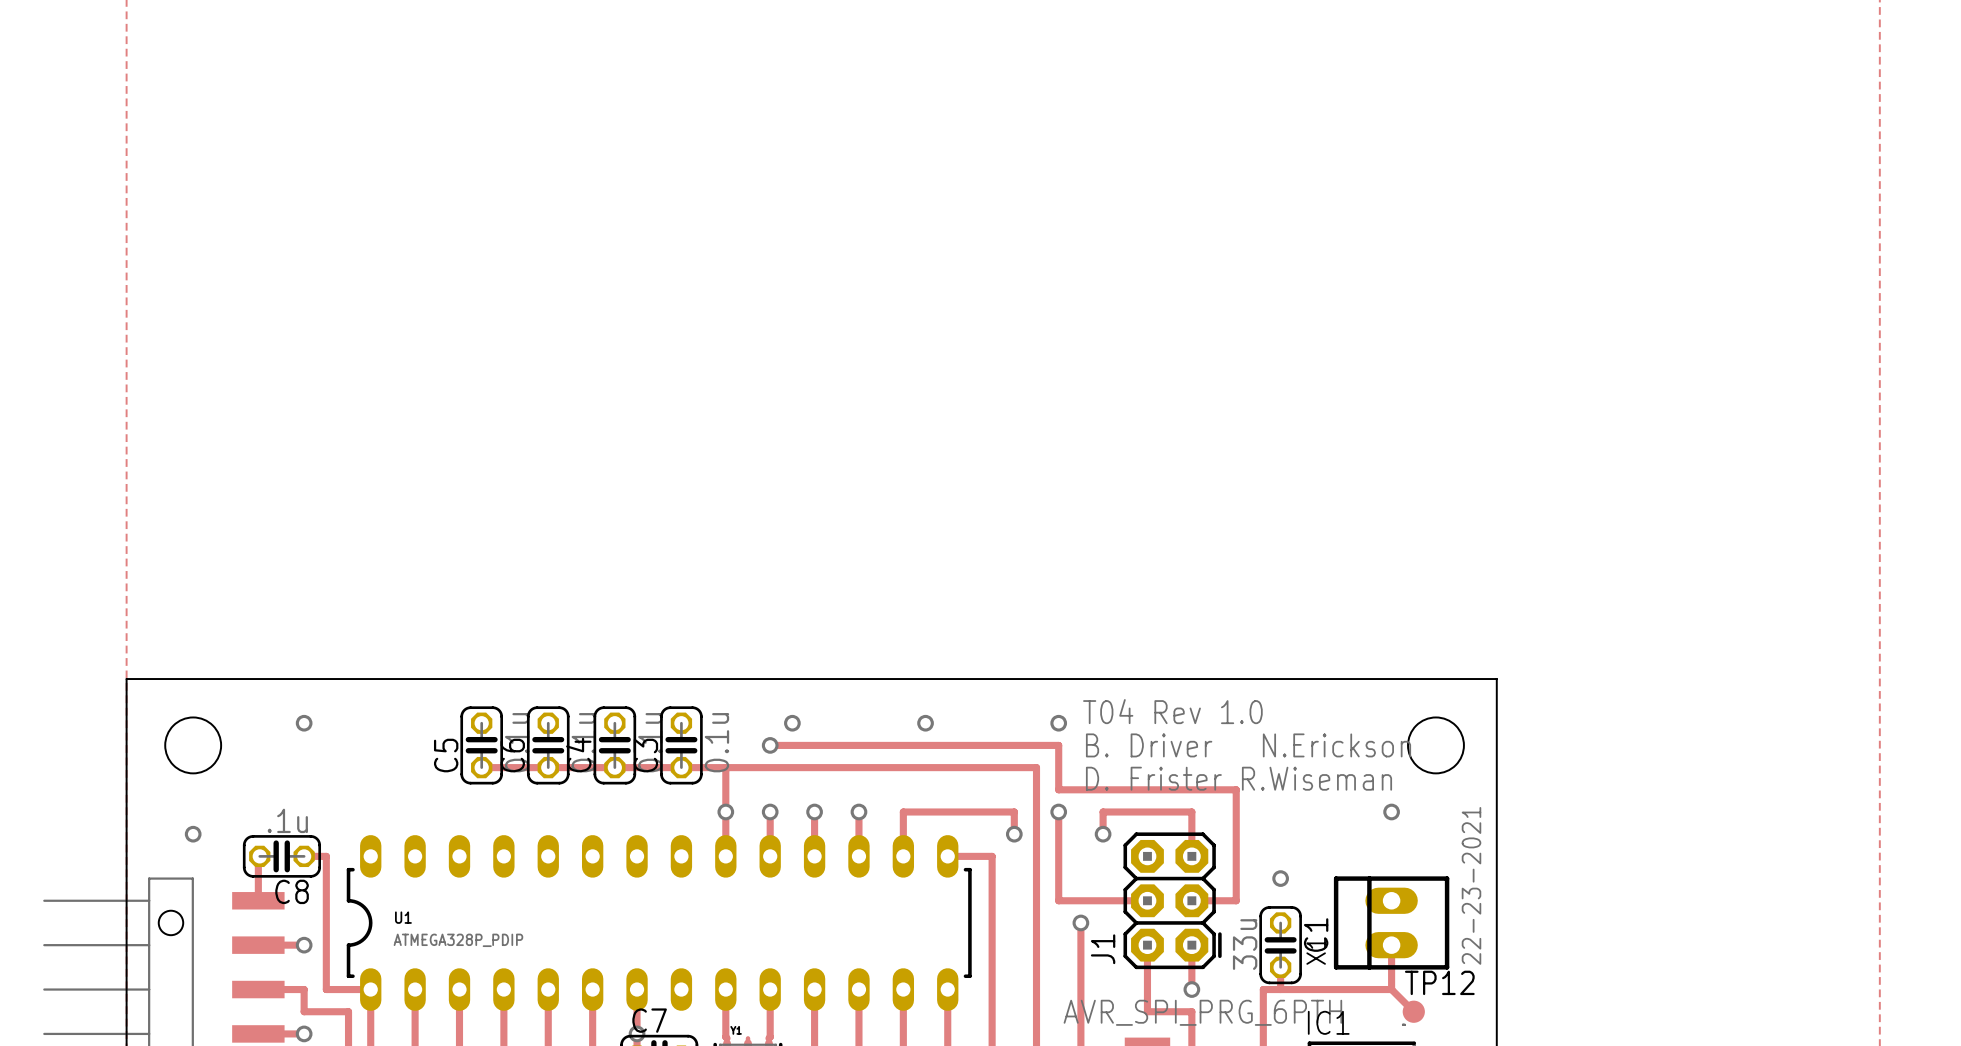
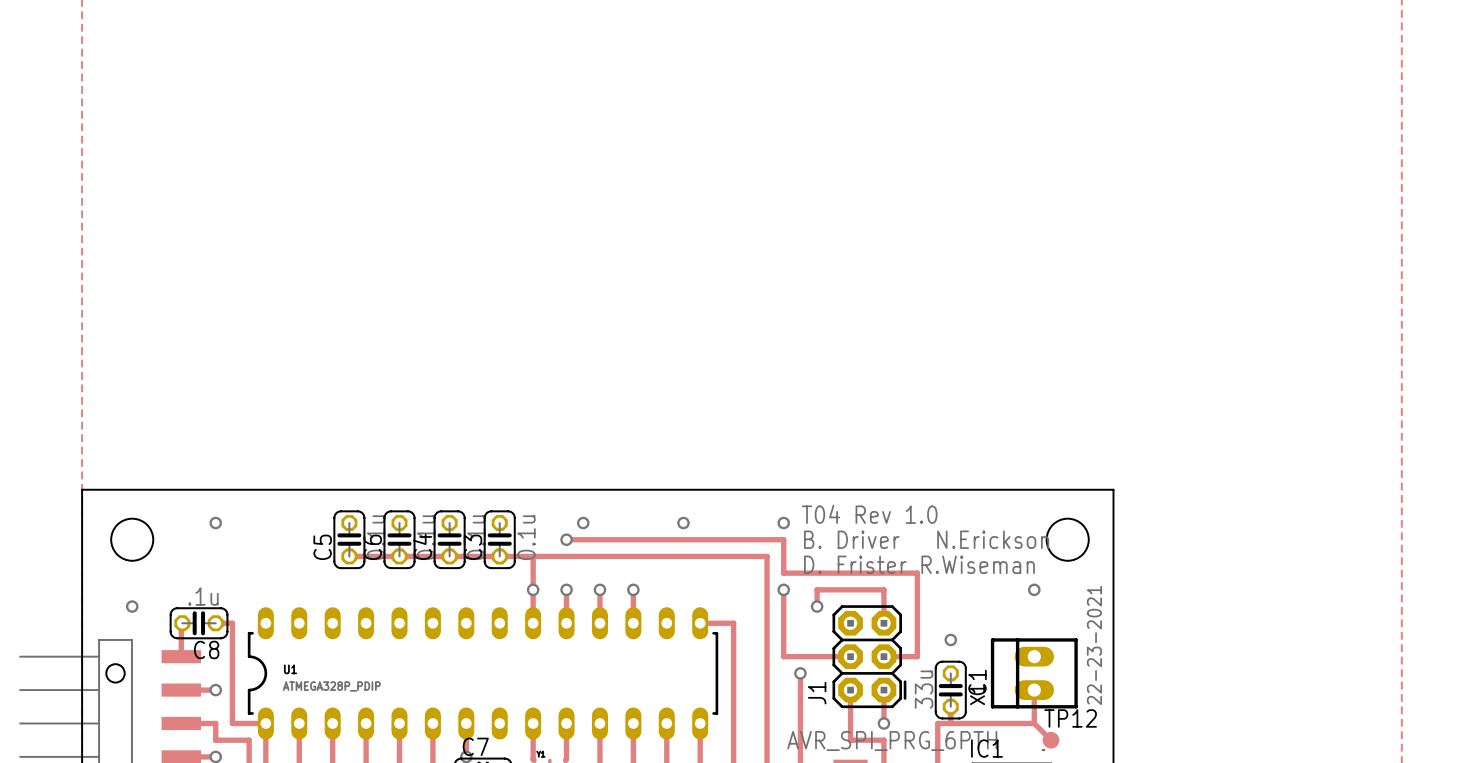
track: (1014, 834) (1014, 811) (903, 811) (903, 856) -> none
via: (1014, 834) -> none

